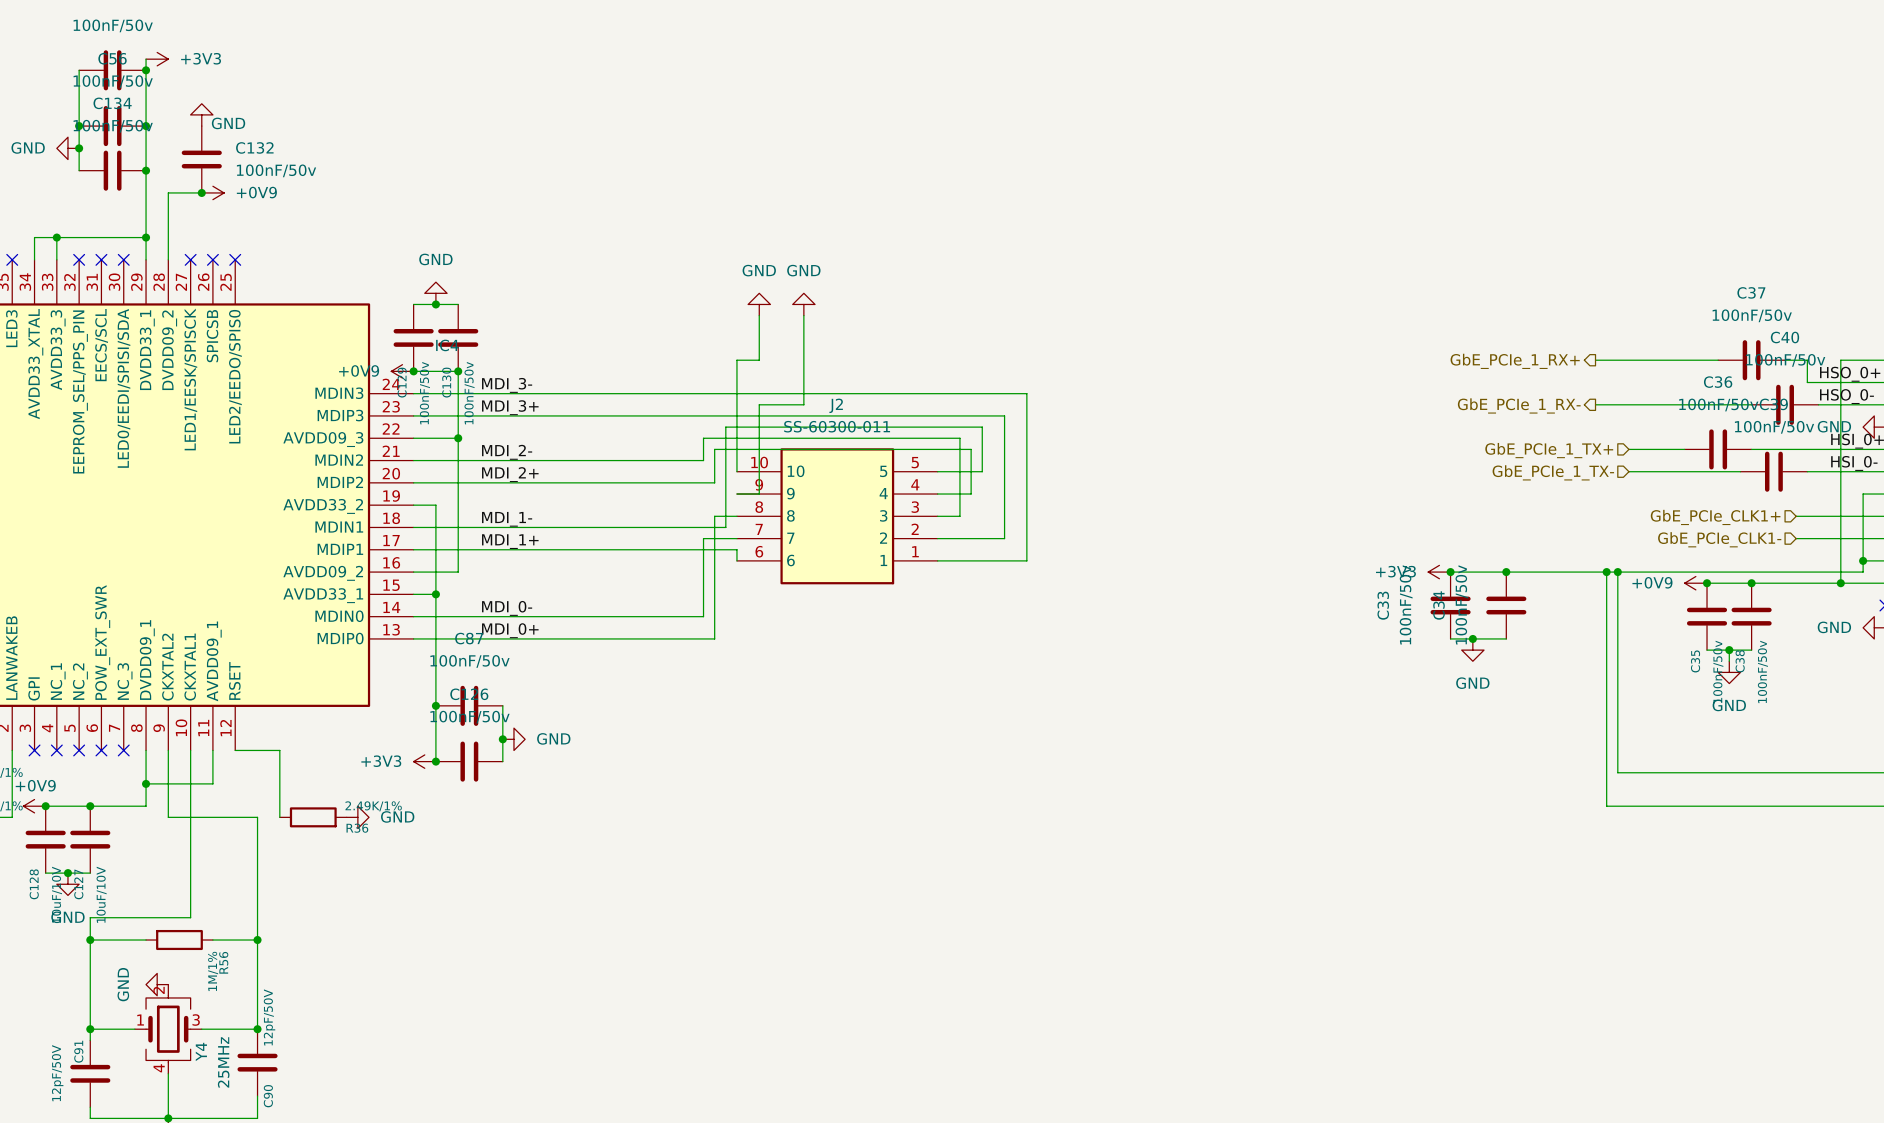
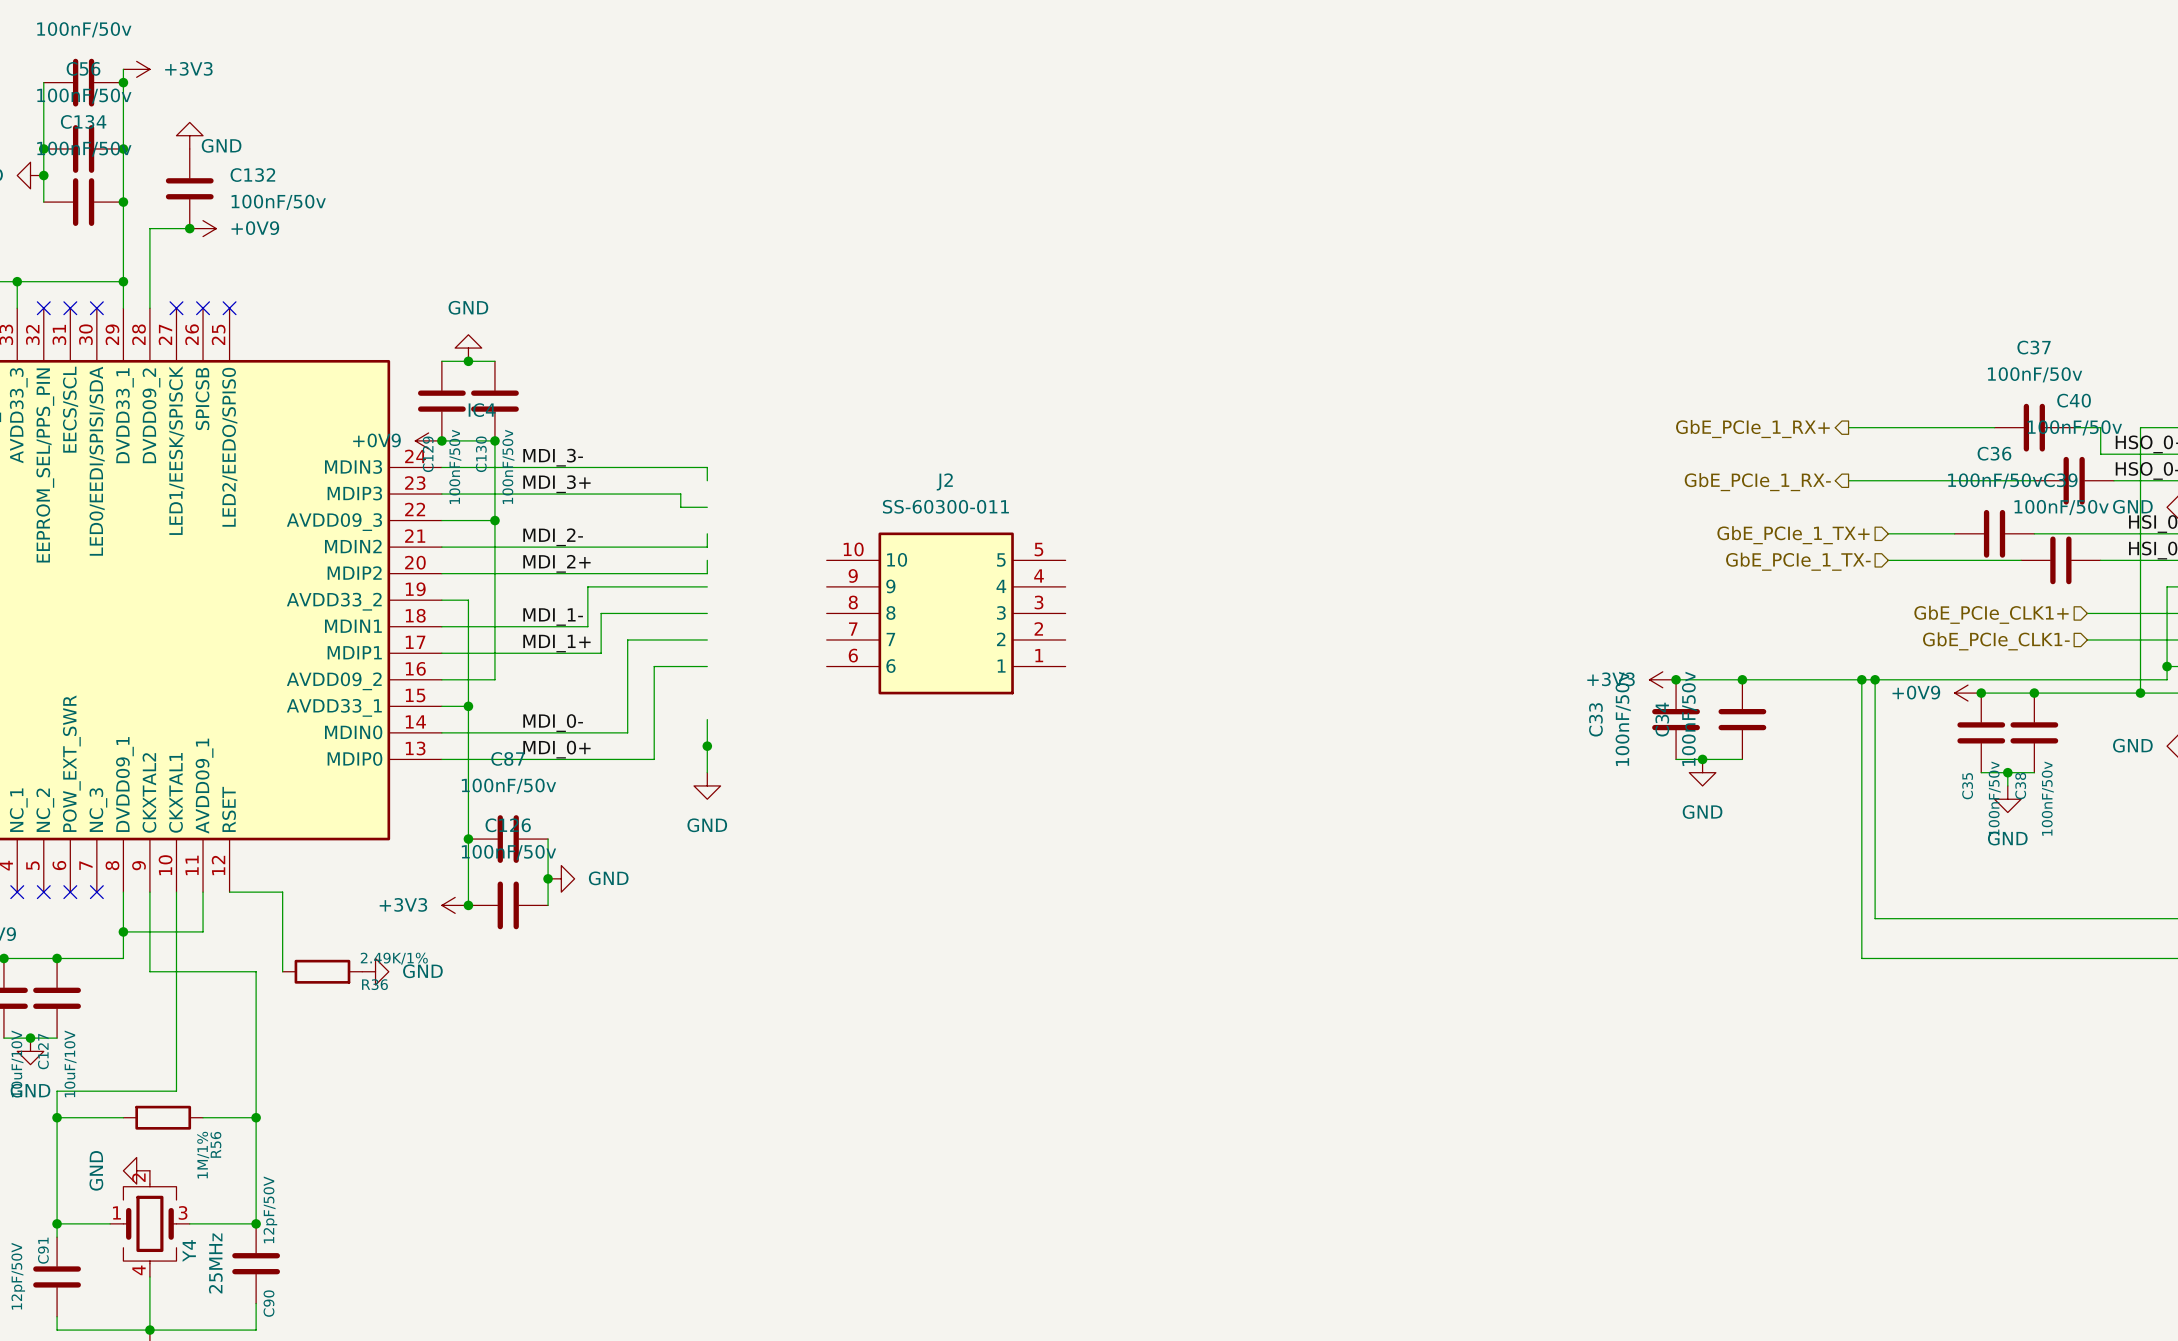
power symbol: GND (759, 304) -> none
power symbol: GND (803, 304) -> none
wire: (759, 315) (759, 360) (736, 360) (736, 471) -> none
wire: (803, 315) (803, 404) (759, 404) (759, 494) (736, 494) -> none
wire: (636, 393) (1026, 393) (1026, 560) (937, 560) -> (707, 467) (707, 480)
wire: (614, 415) (1004, 415) (1004, 538) (937, 538) -> (680, 494) (680, 507) (707, 507)
wire: (636, 460) (703, 460) (703, 438) (959, 438) (959, 516) (937, 516) -> (707, 547) (707, 533)
wire: (937, 471) (982, 471) (982, 427) (725, 427) (725, 527) (536, 527) -> (707, 586) (587, 586) (587, 626)
wire: (636, 482) (714, 482) (714, 449) (971, 449) (971, 494) (937, 494) -> (707, 573) (707, 560)
wire: (736, 516) (714, 516) (714, 638) (592, 638) -> (707, 666) (654, 666) (654, 759)
wire: (736, 538) (703, 538) (703, 616) (569, 616) -> (707, 639) (627, 639) (627, 732)
wire: (547, 549) (736, 549) (736, 560) -> (601, 653) (601, 613) (707, 613)
wire: none -> (707, 719) (707, 772)
junction: none -> (707, 746)
power symbol: none -> GND (707, 785)

